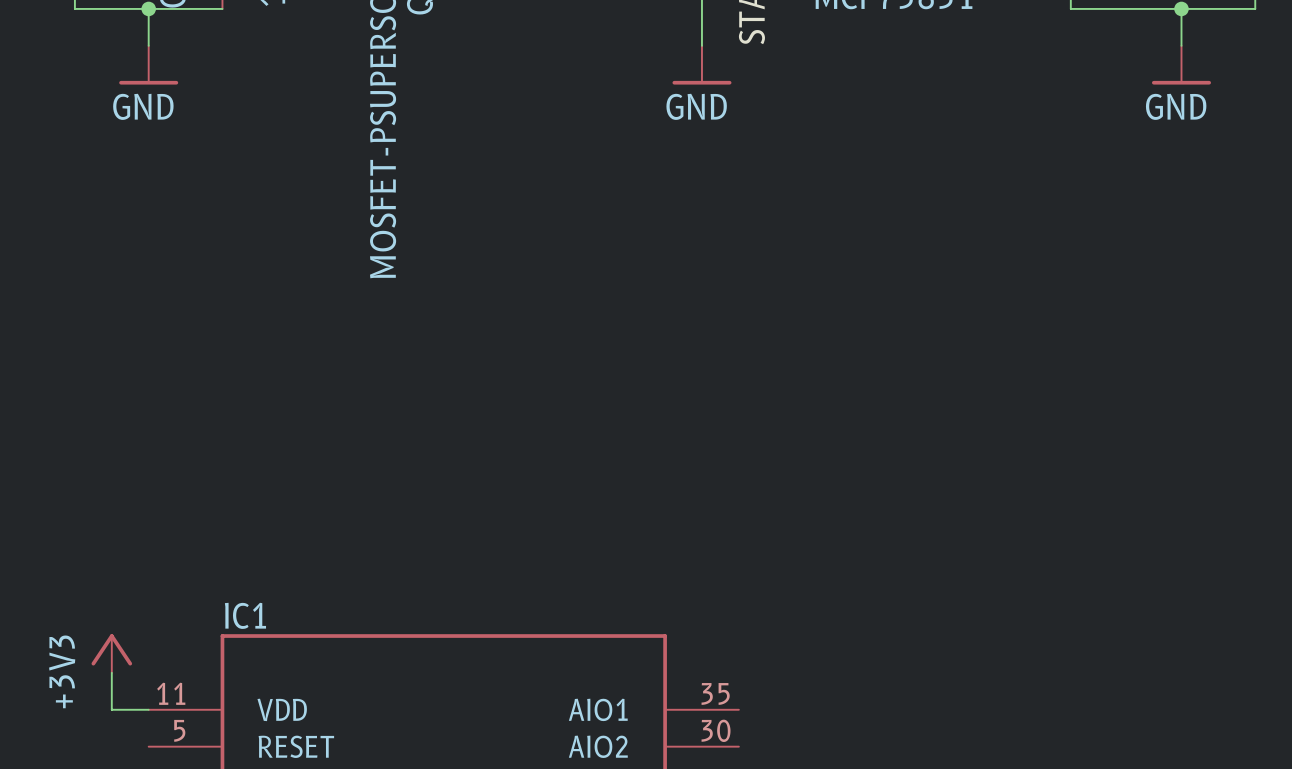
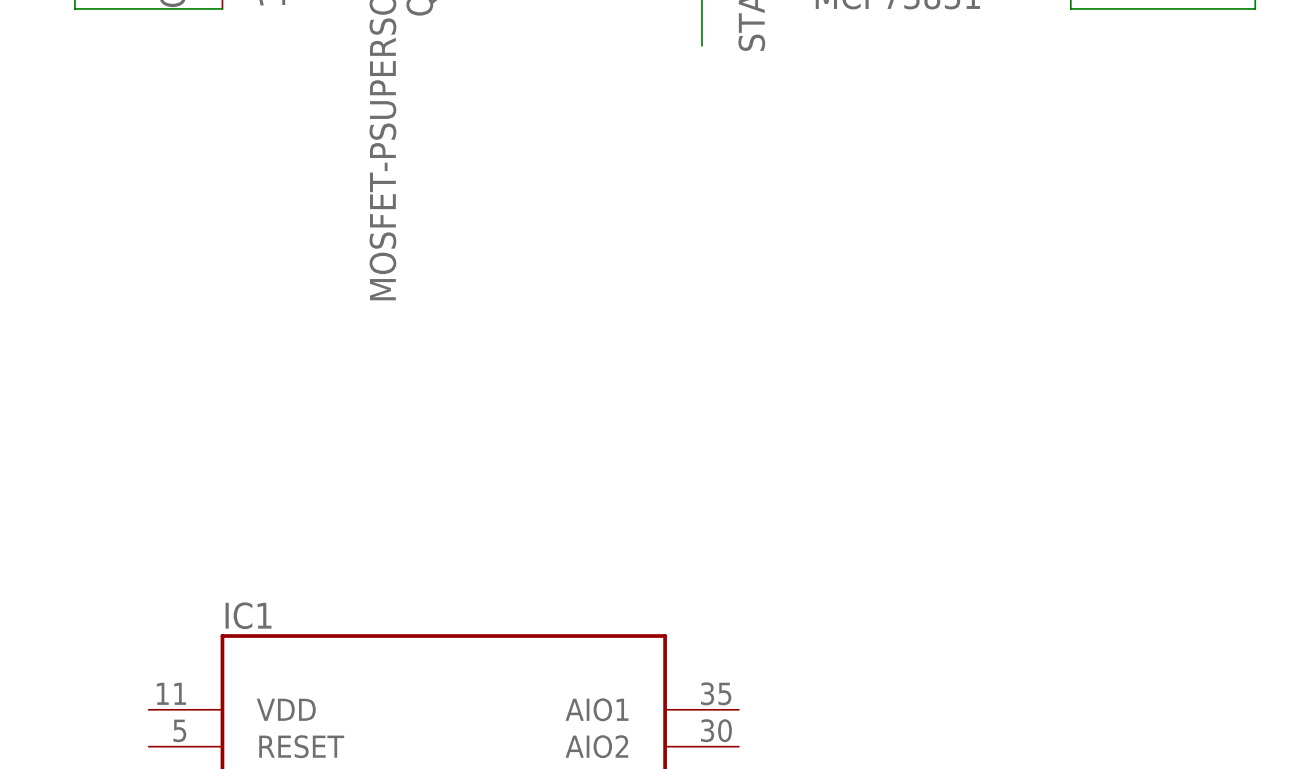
wire: (148, 8) (148, 45) -> none
junction: (148, 8) -> none
wire: (1181, 8) (1181, 45) -> none
junction: (1181, 8) -> none
power symbol: GND (148, 65) -> none
power symbol: GND (701, 65) -> none
power symbol: GND (1181, 65) -> none
power symbol: +3V3 (111, 653) -> none
wire: (111, 672) (111, 709) (148, 709) -> none

